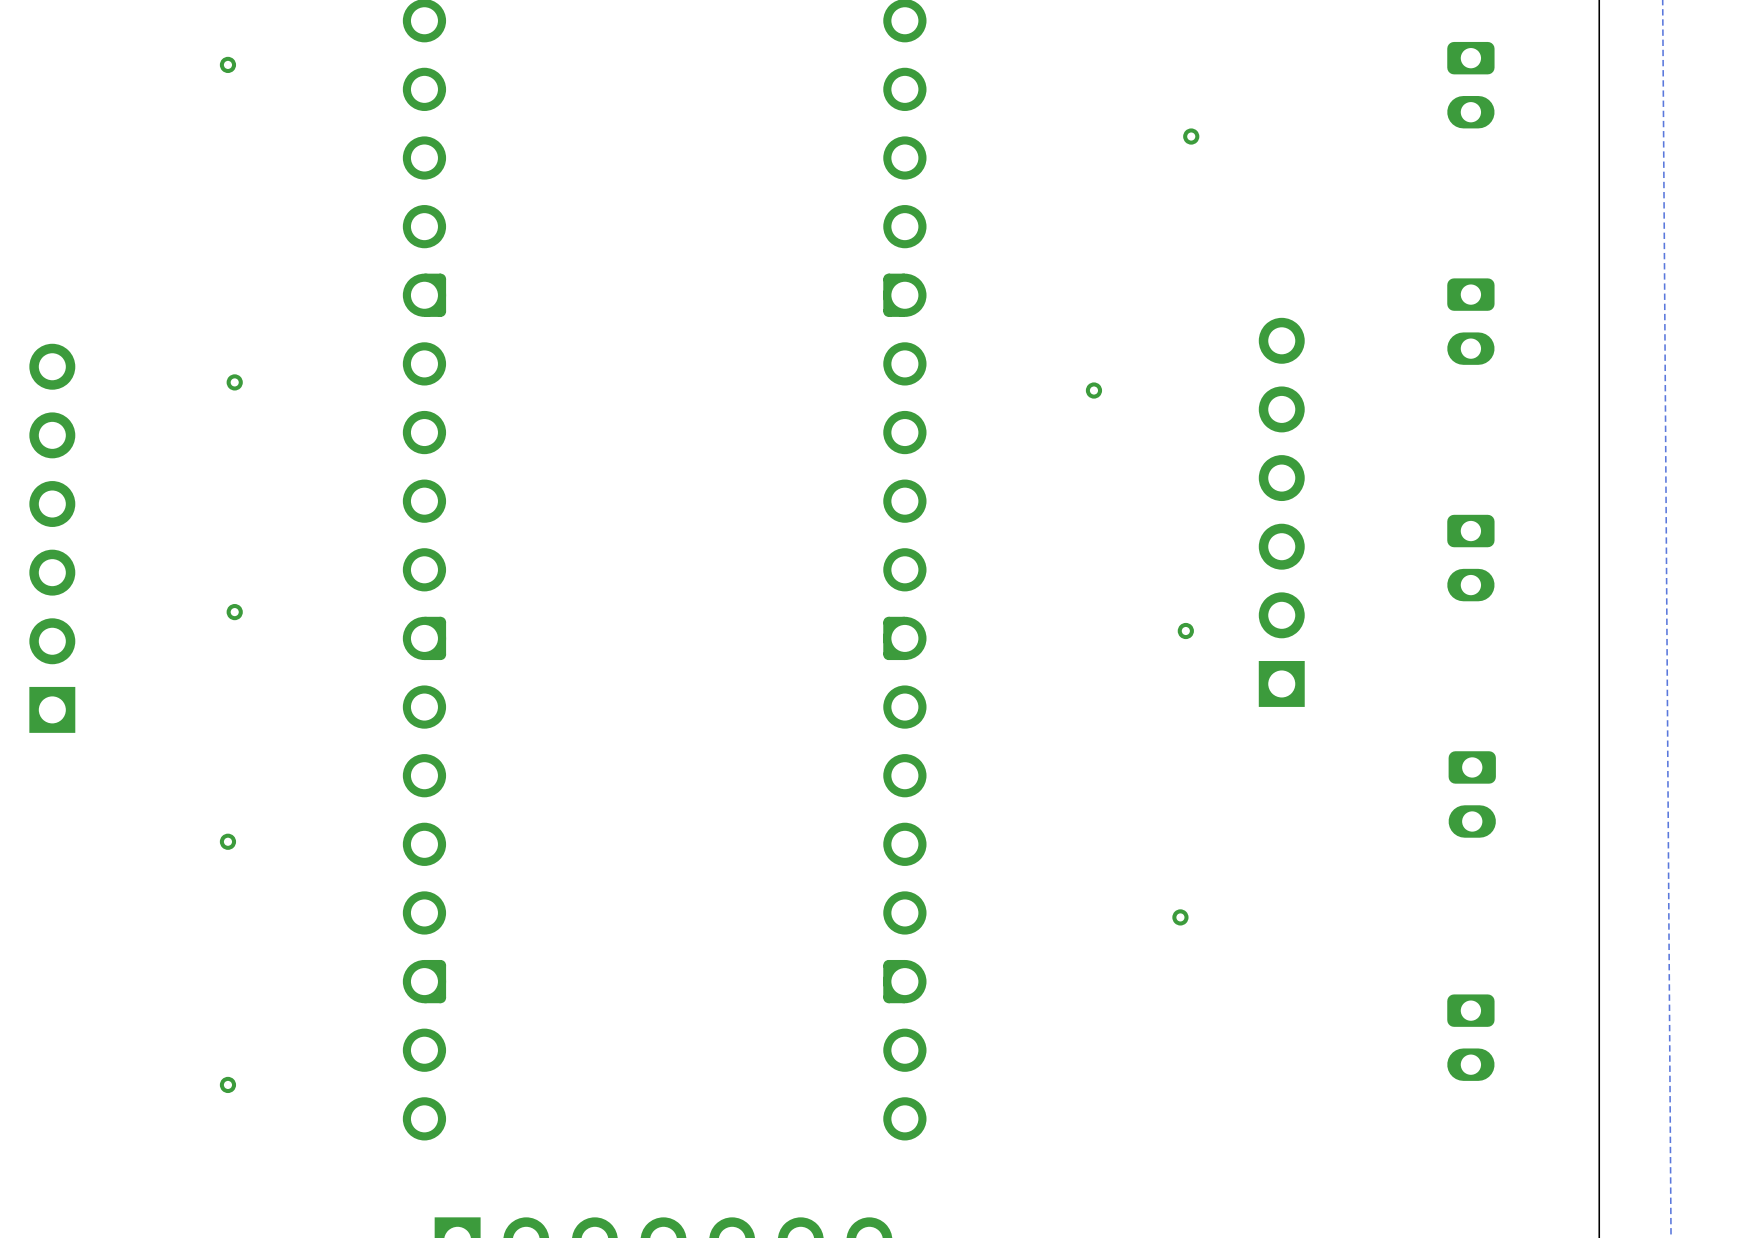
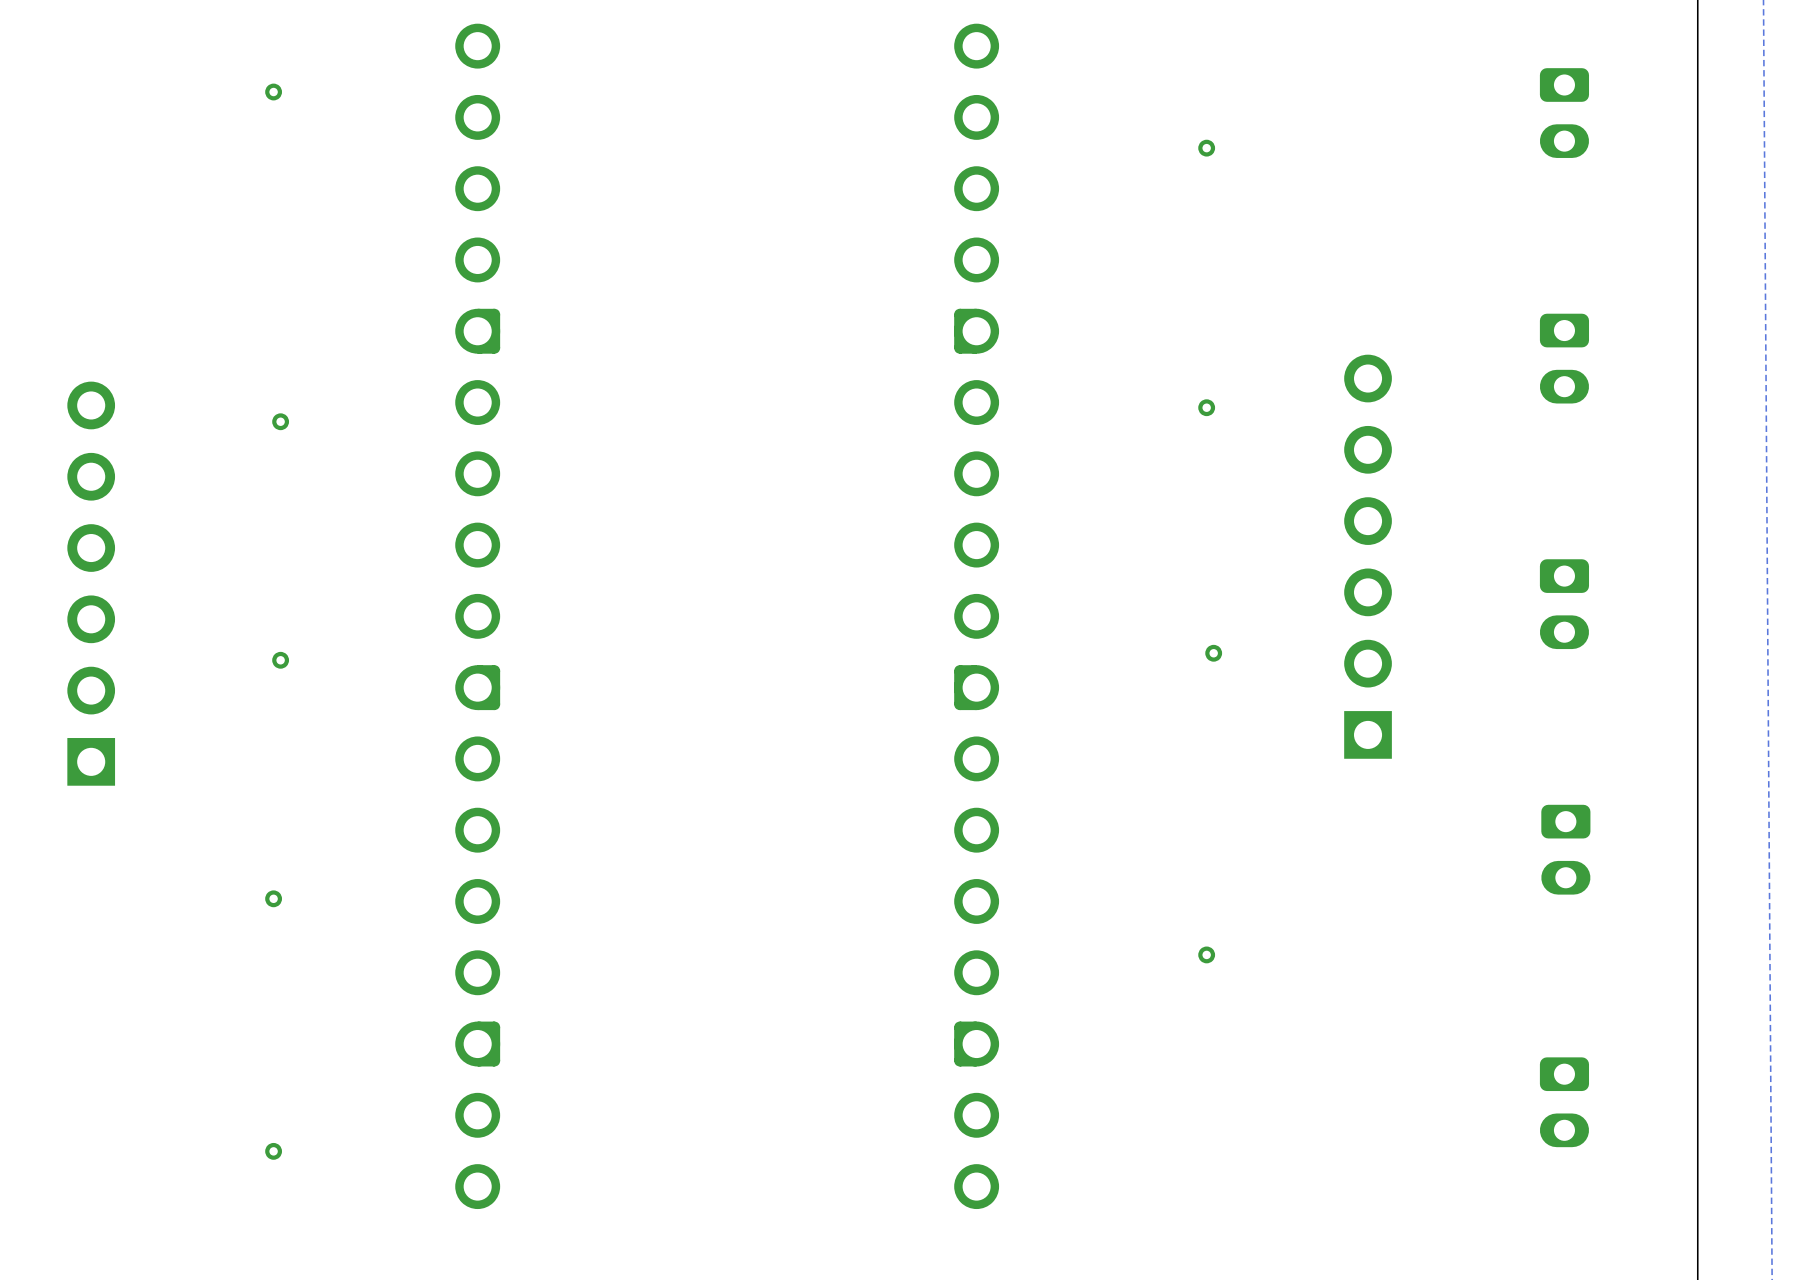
via position: (1191, 136) -> (1206, 148)
via position: (1093, 390) -> (1206, 407)
via position: (1185, 631) -> (1213, 653)
via position: (1180, 917) -> (1206, 954)

